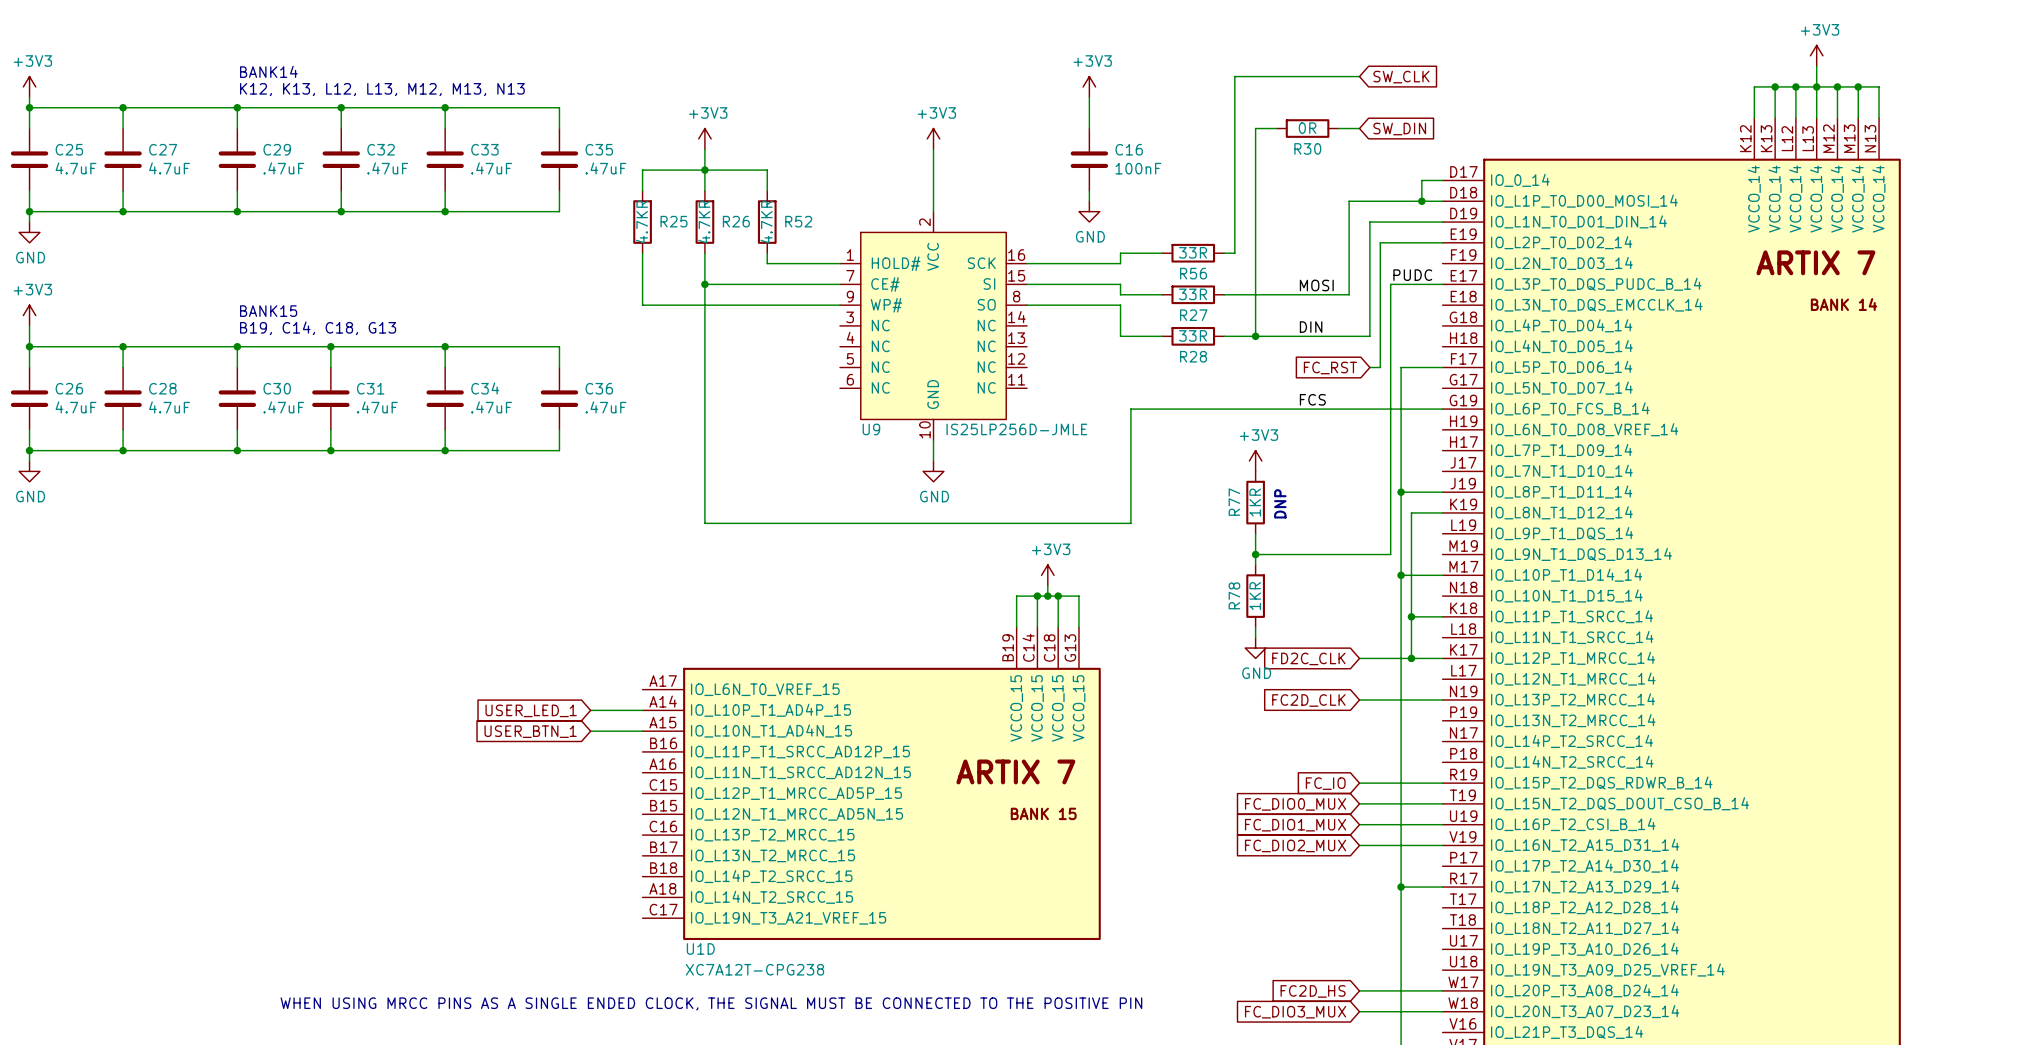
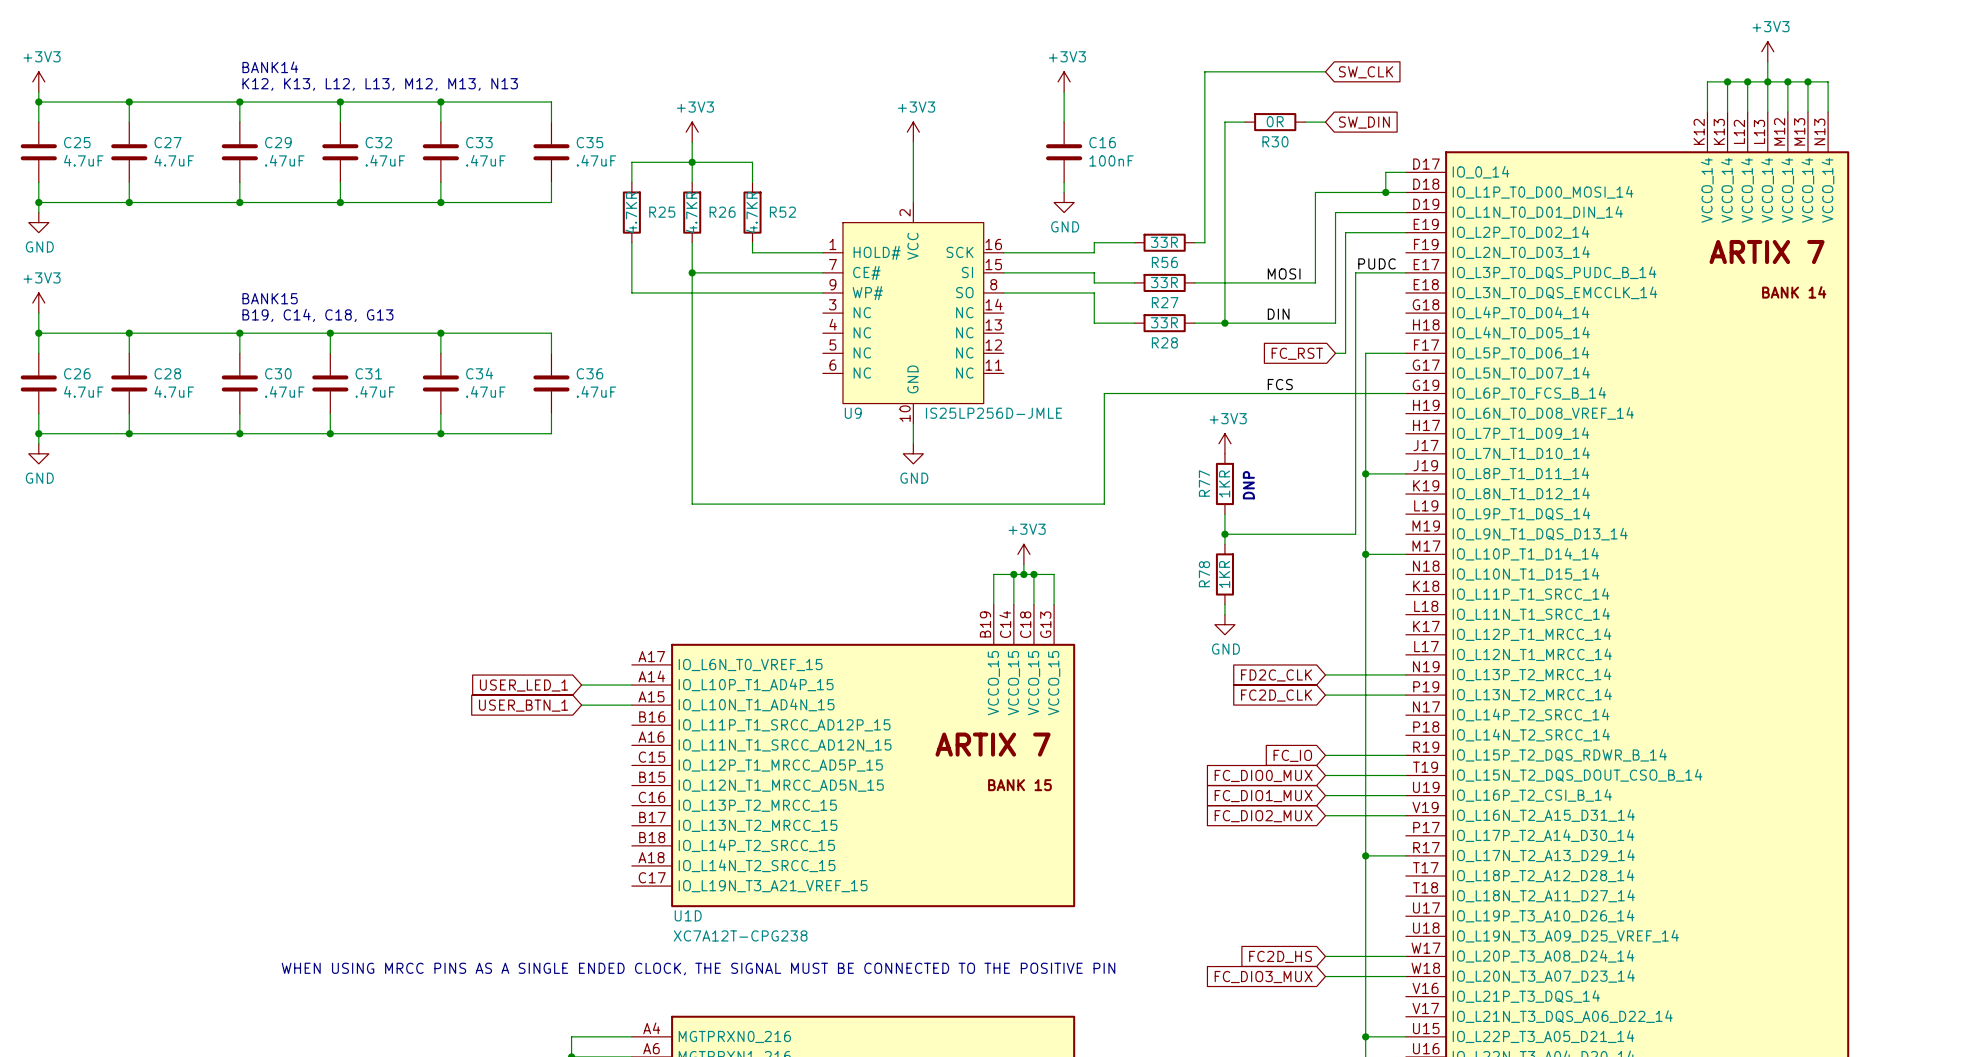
wire: (1442, 512) (1411, 512) (1411, 658) -> none
wire: (1411, 616) (1442, 616) -> none
junction: (1411, 616) -> none
global label: FD2C_CLK (1308, 658) -> none
wire: (1359, 658) (1442, 658) -> (1325, 695) (1405, 695)
junction: (1411, 658) -> none
global label: FC2D_CLK (1308, 700) -> FD2C_CLK (1276, 675)
global label: none -> FC2D_CLK (1276, 695)

